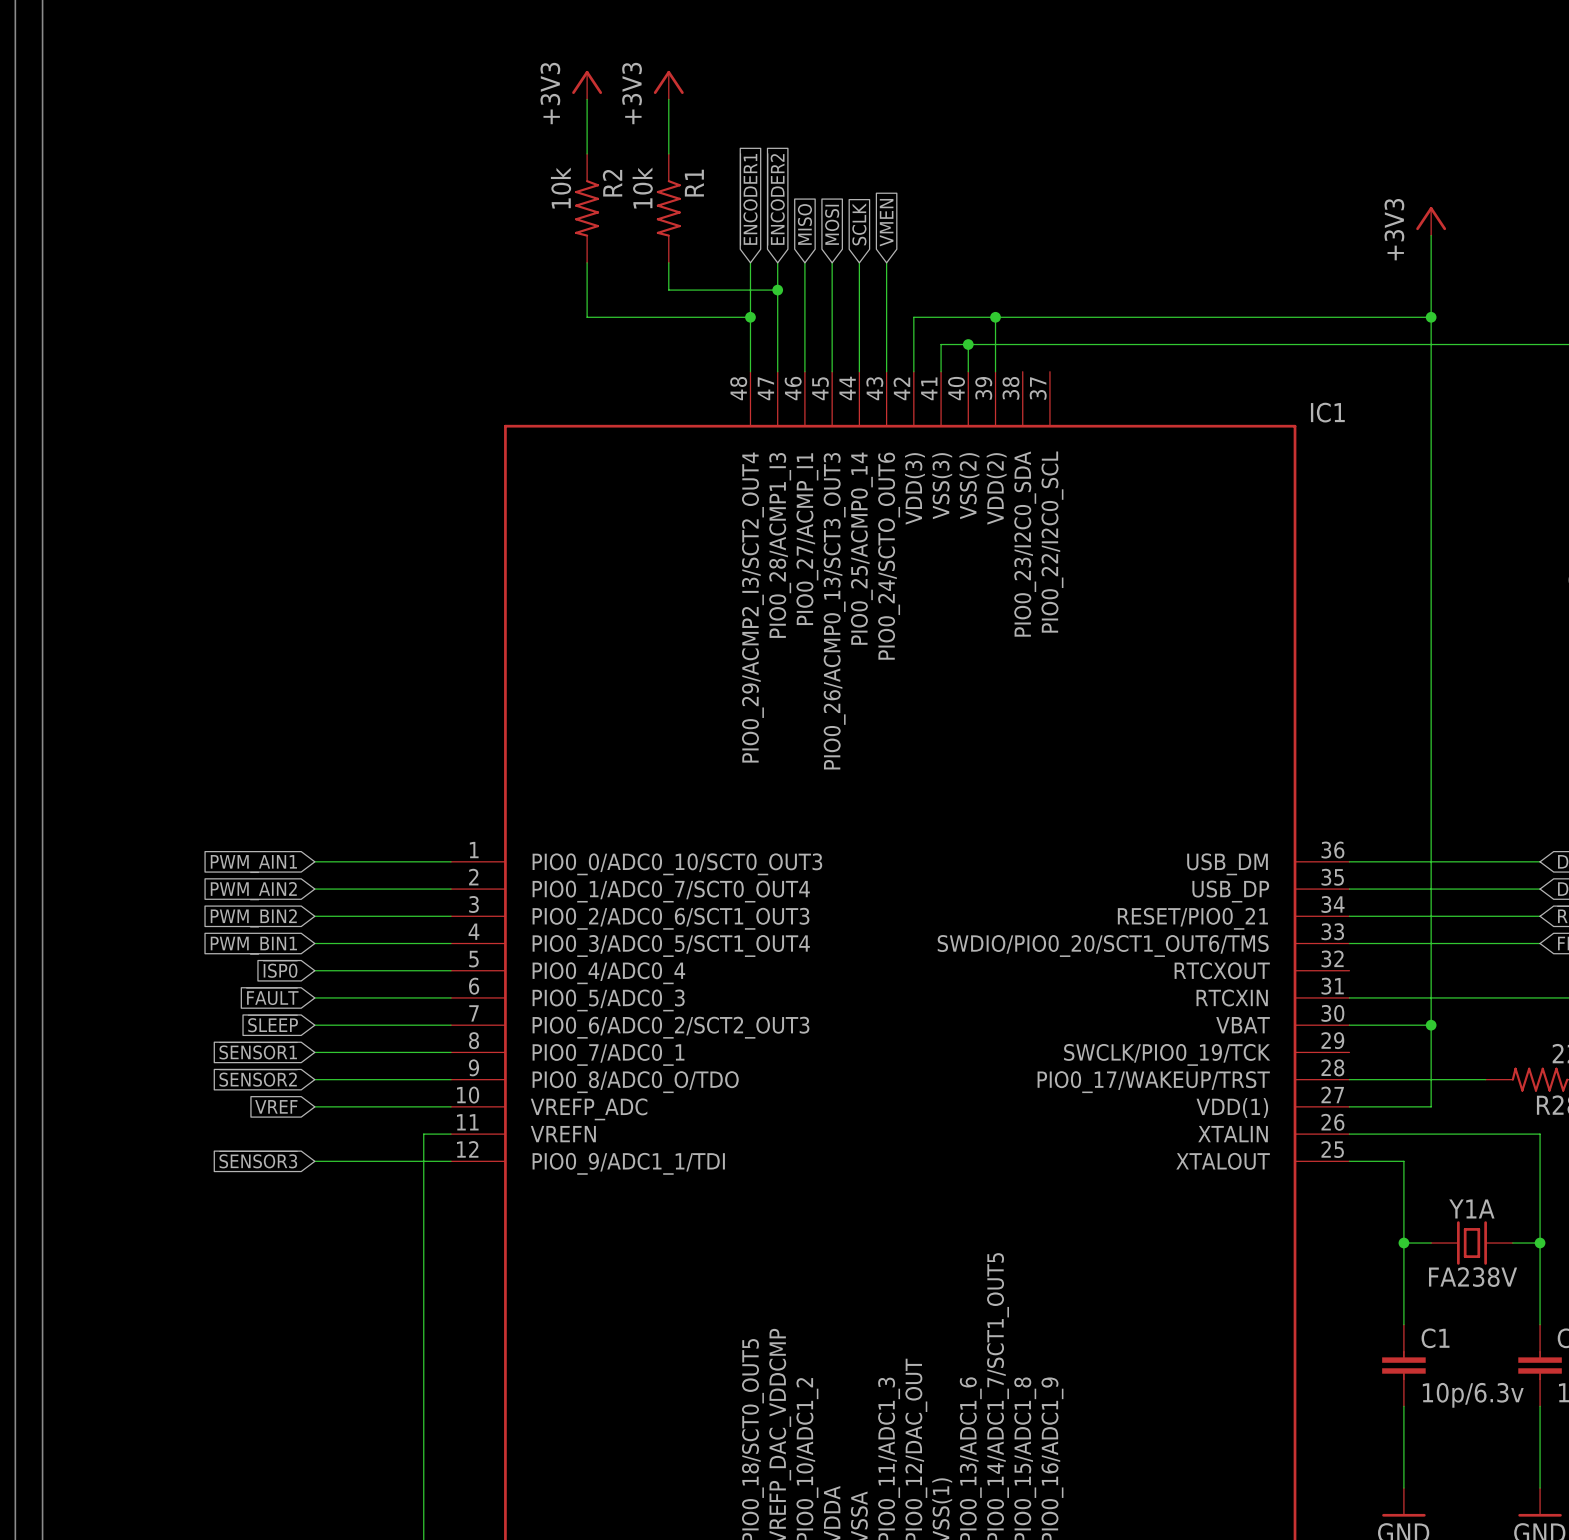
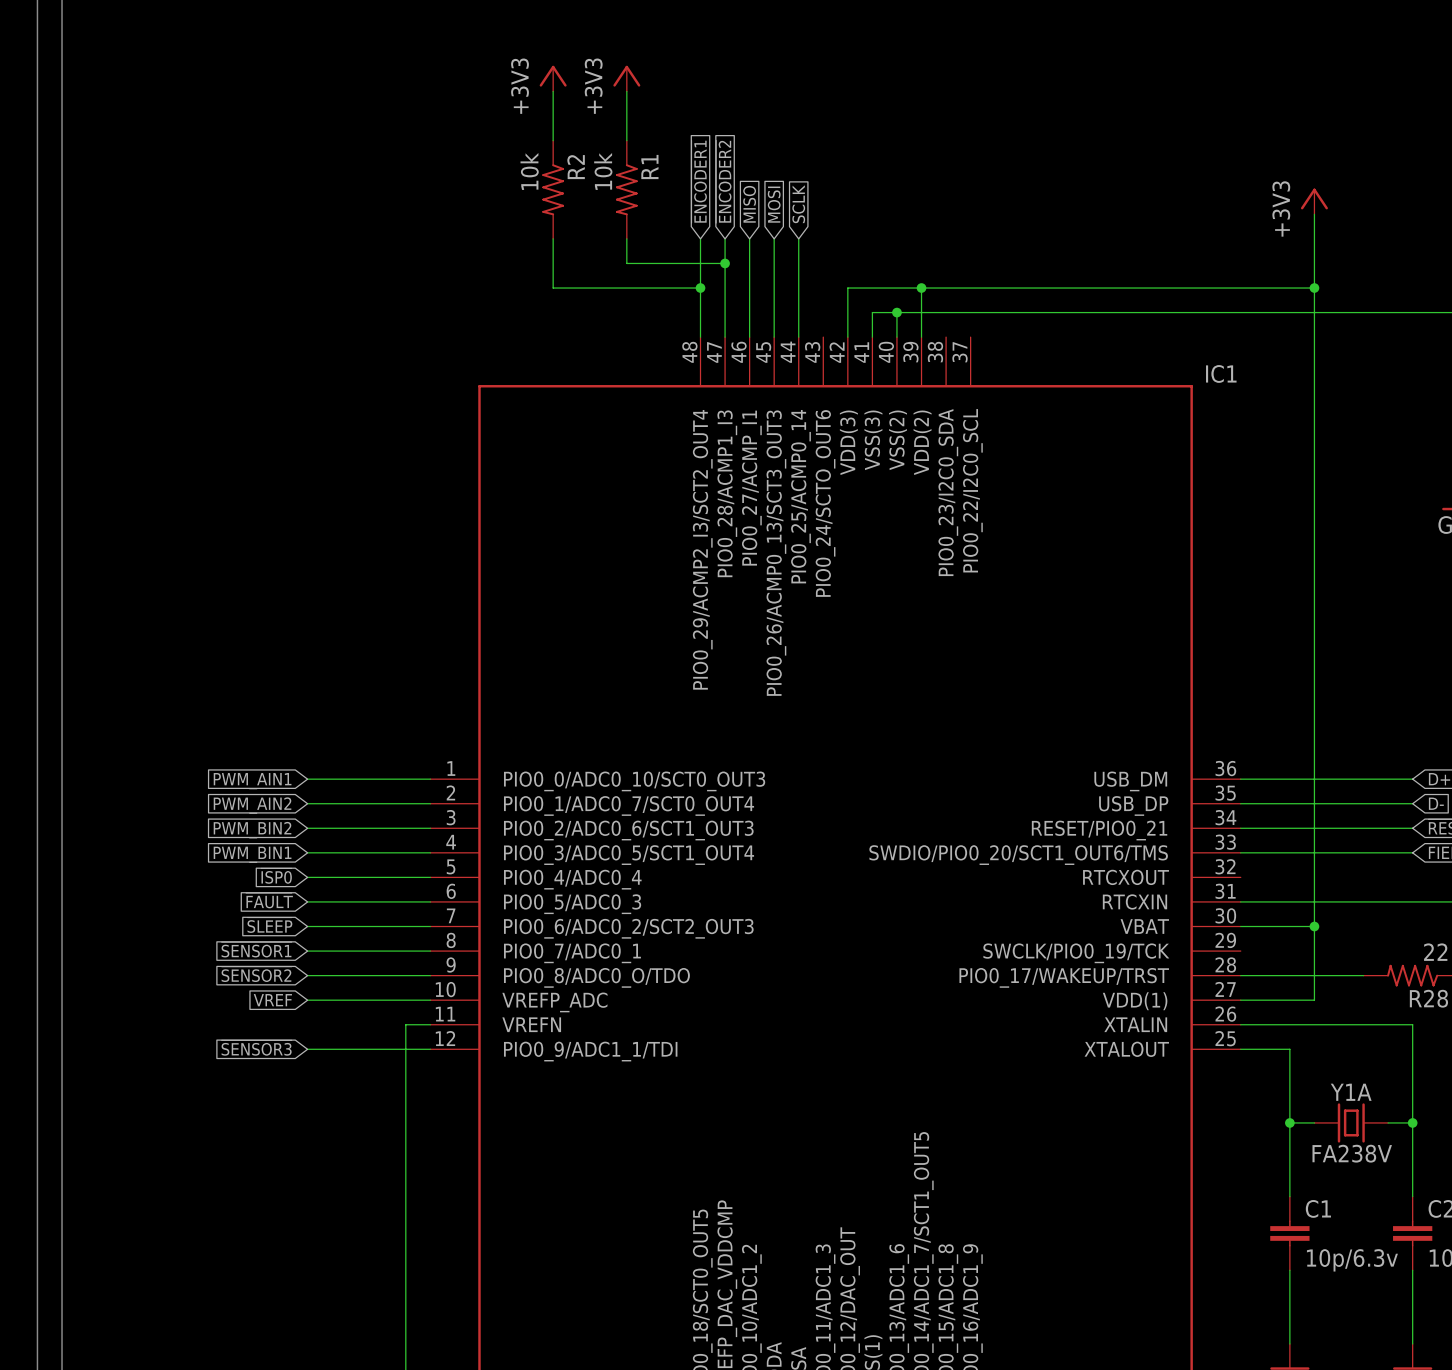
global label: VMEN (886, 222) -> none
wire: (886, 262) (886, 371) -> none

